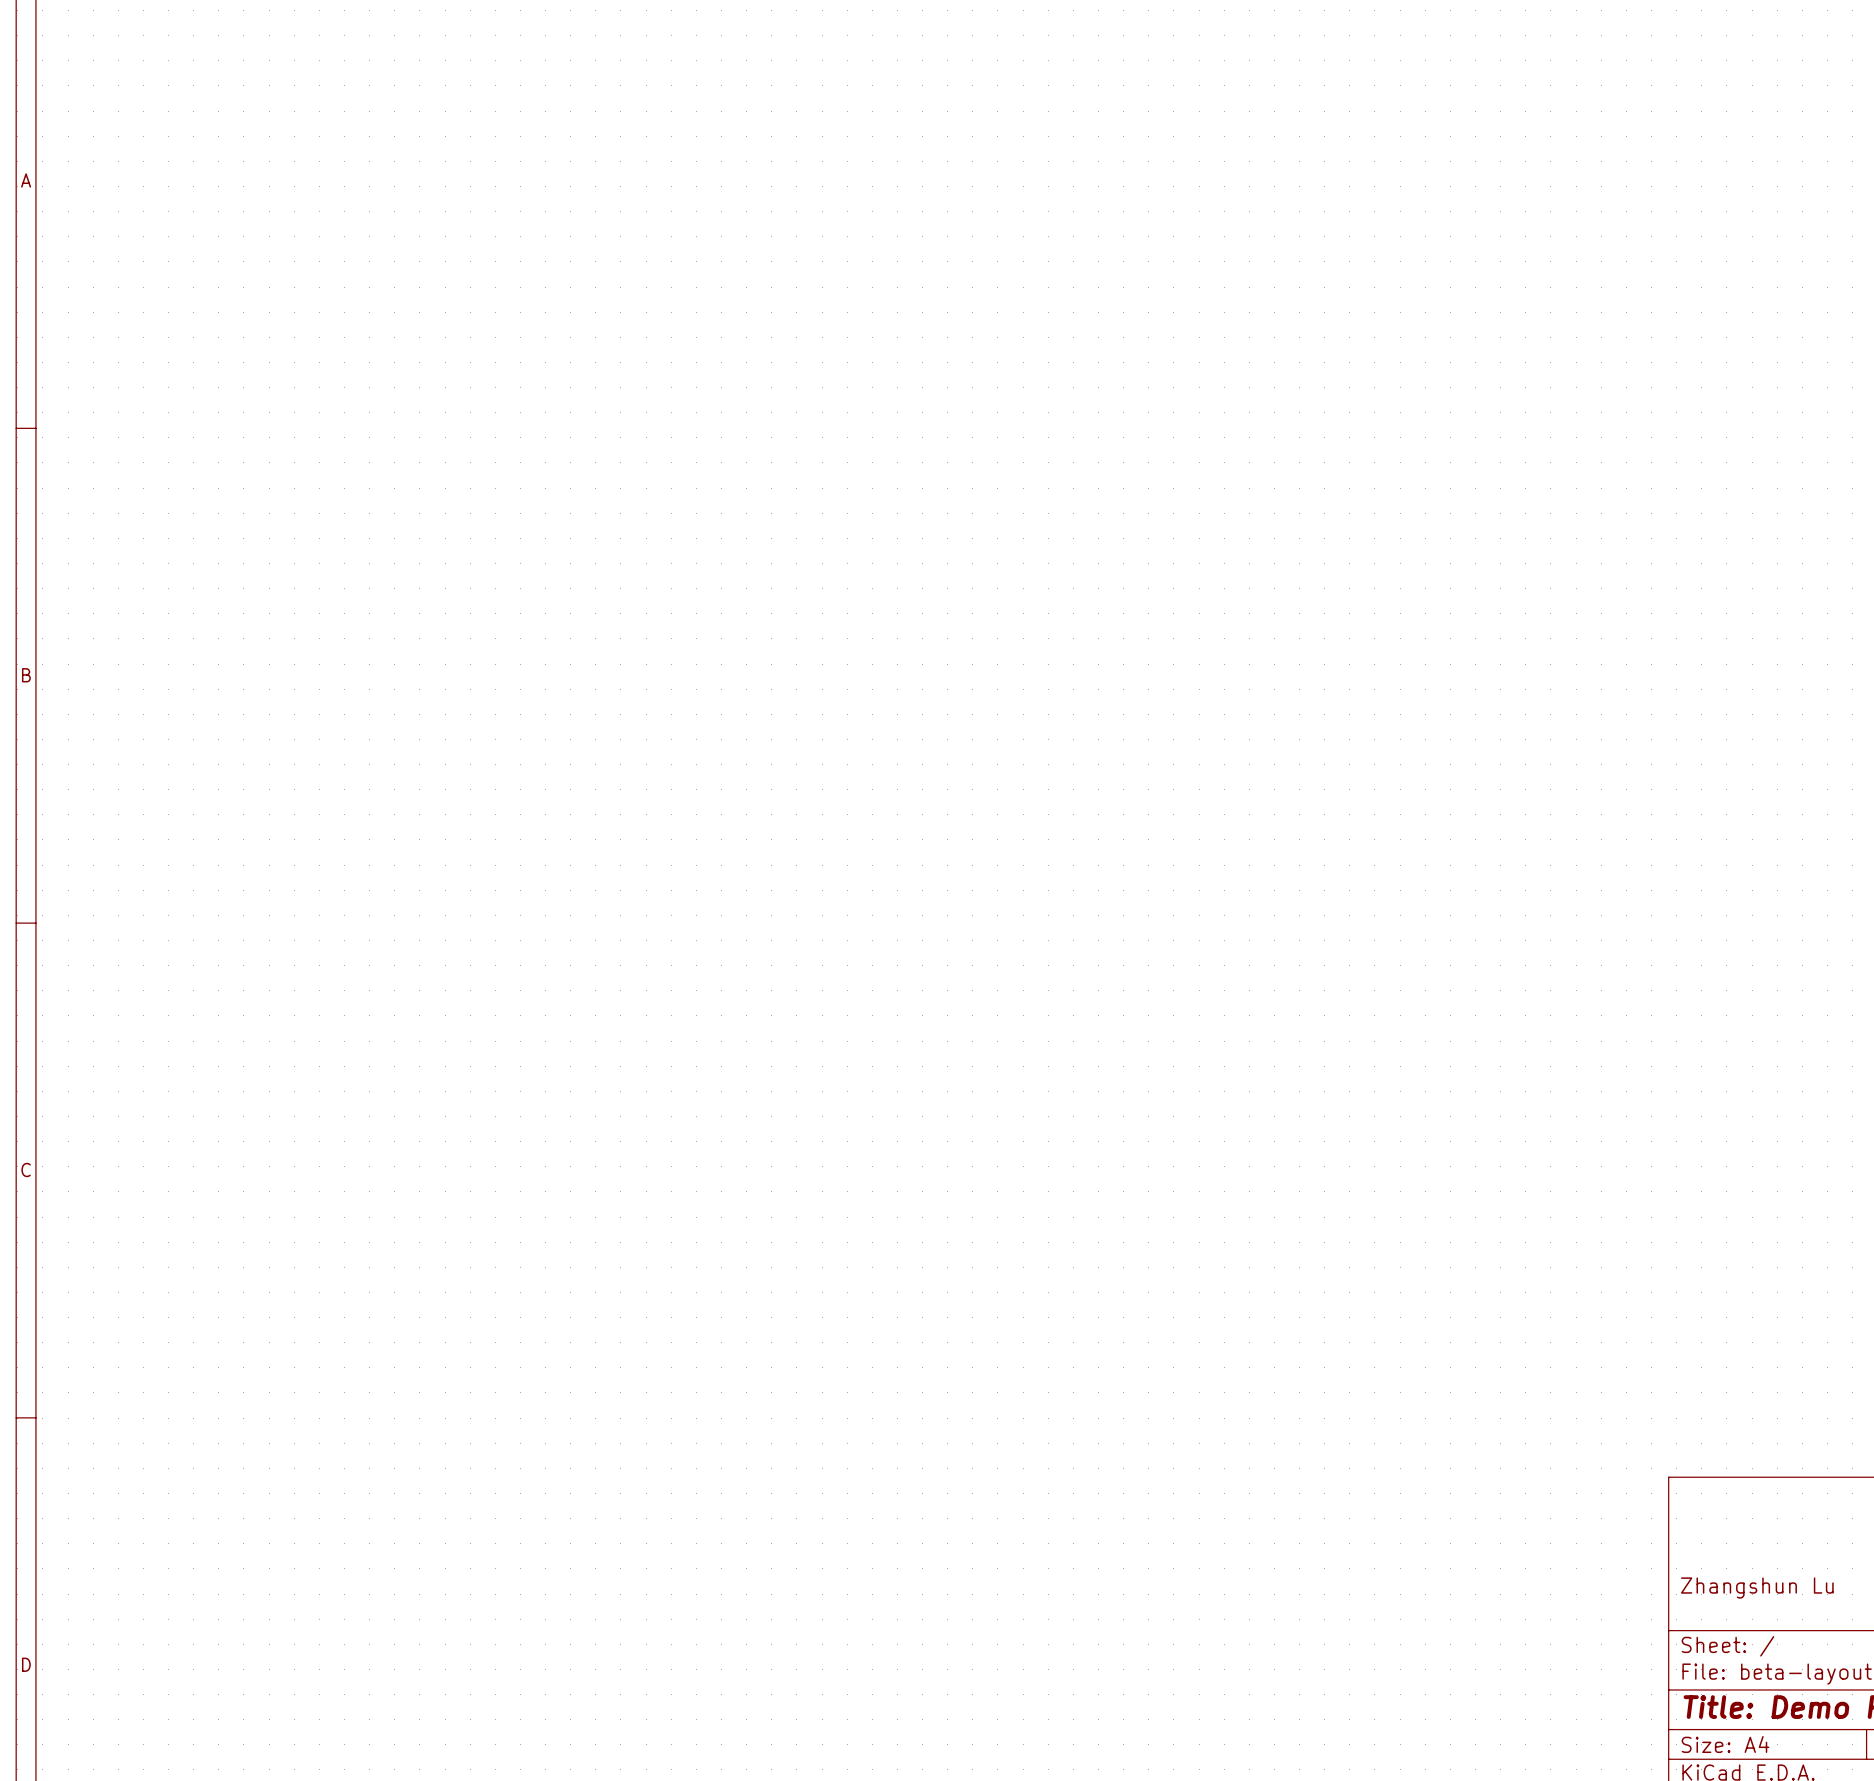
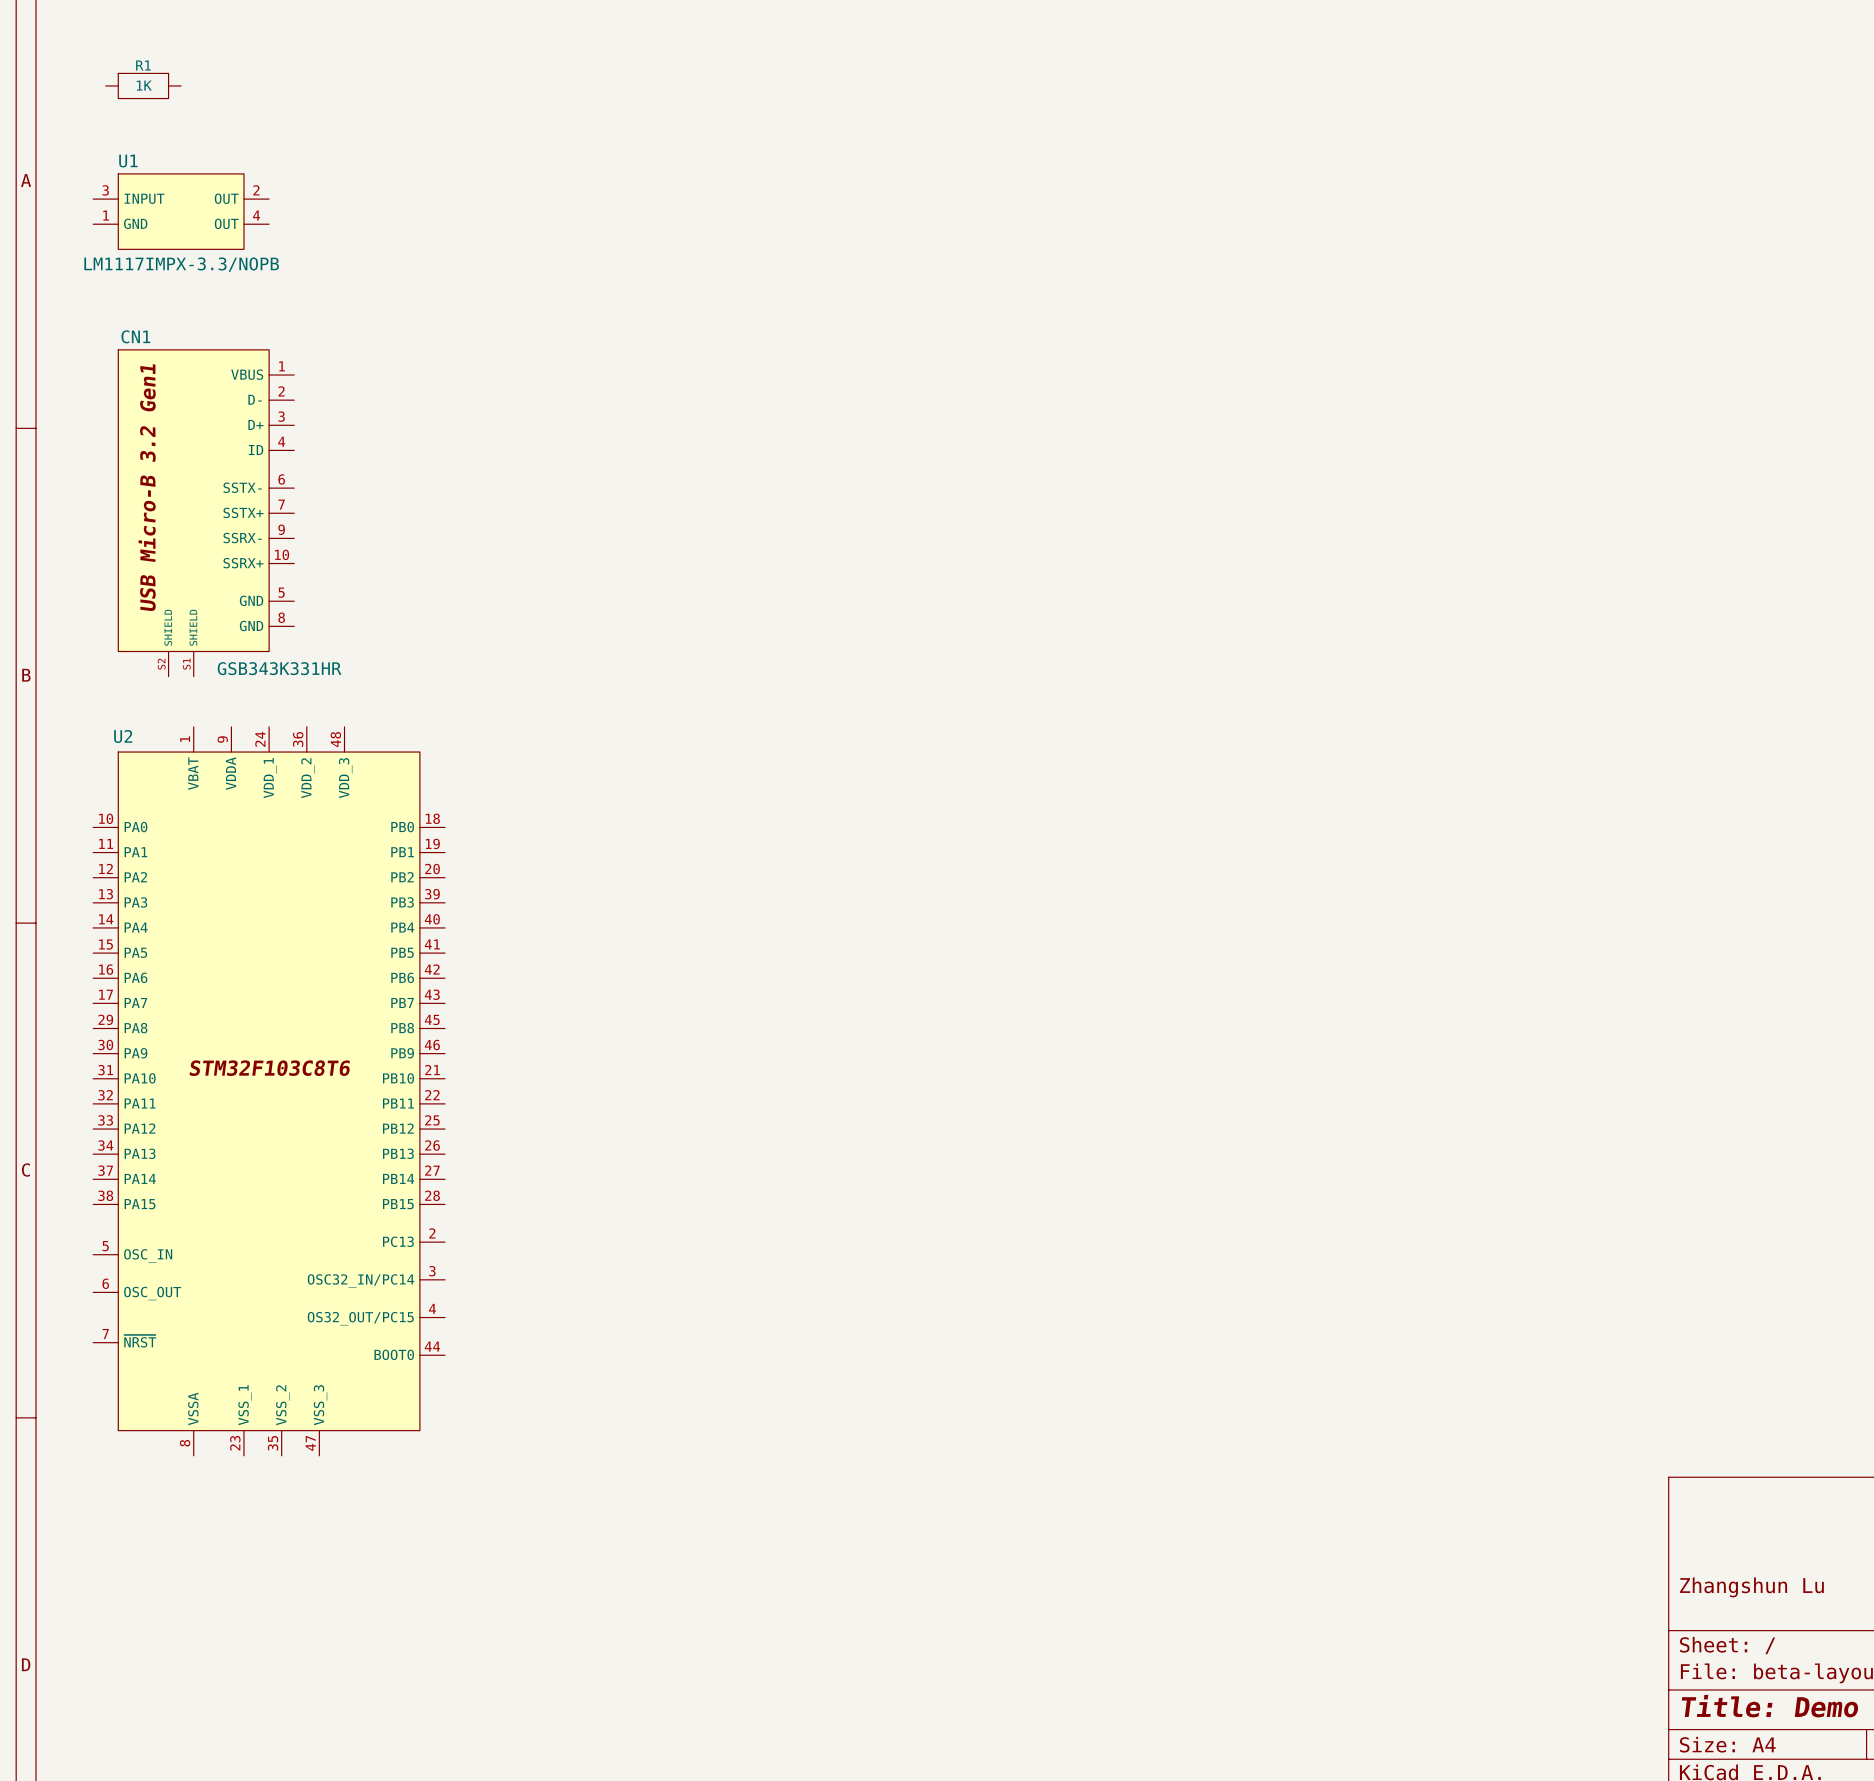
R1: none -> 1K (143, 85)
U1: none -> LM1117IMPX-3.3/NOPB (181, 211)
CN1: none -> GSB343K331HR (206, 513)
U2: none -> (269, 1091)

